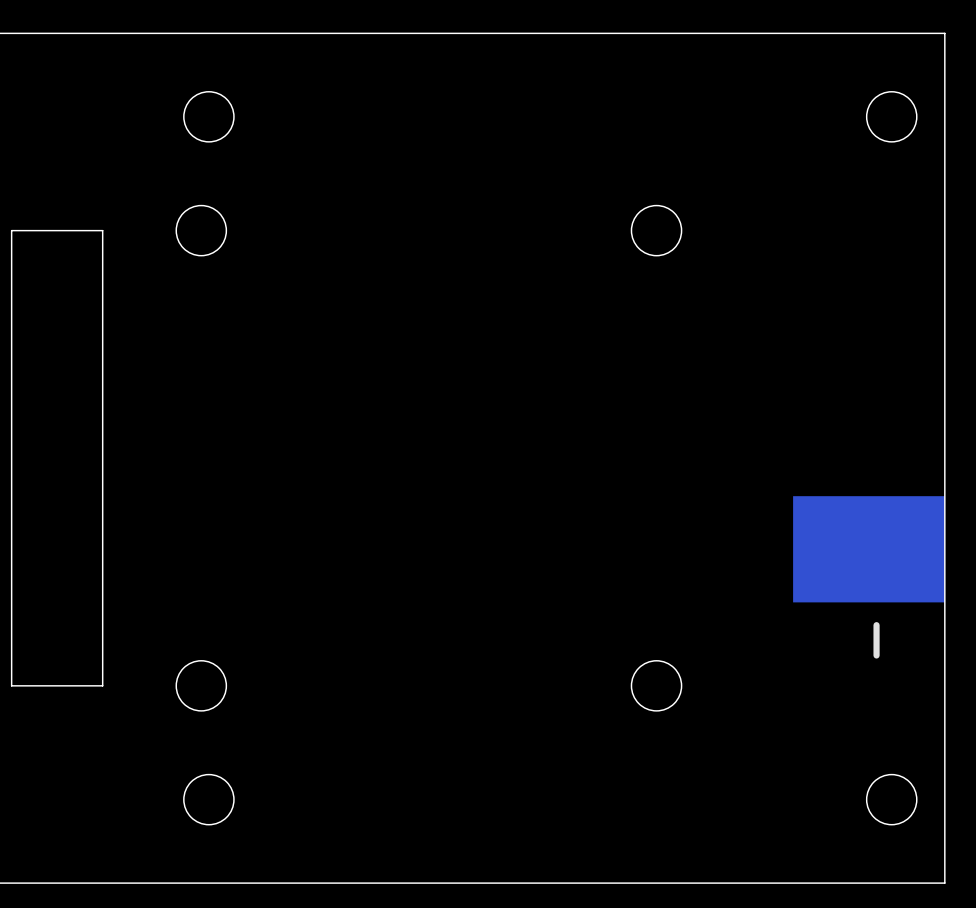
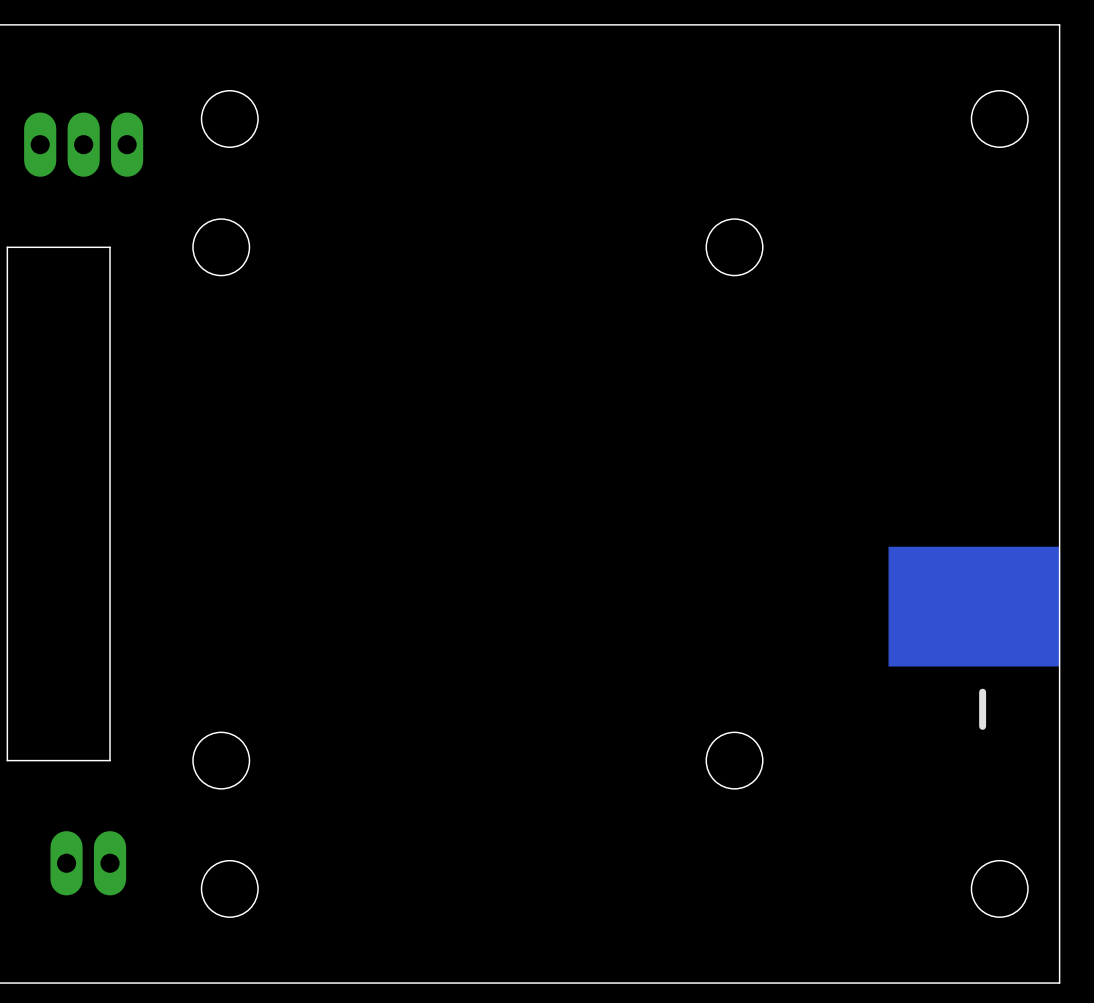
part: none -> (83, 144)
part: none -> (88, 863)

